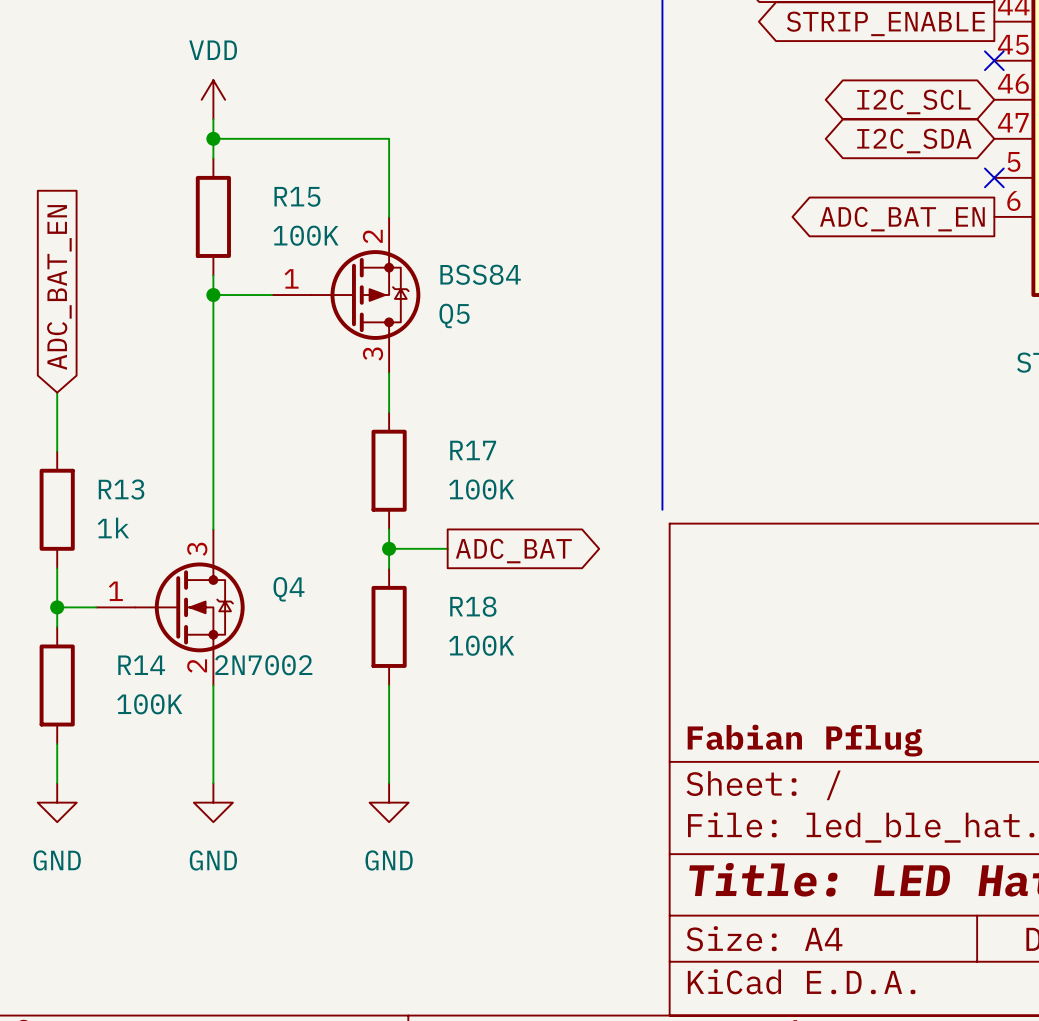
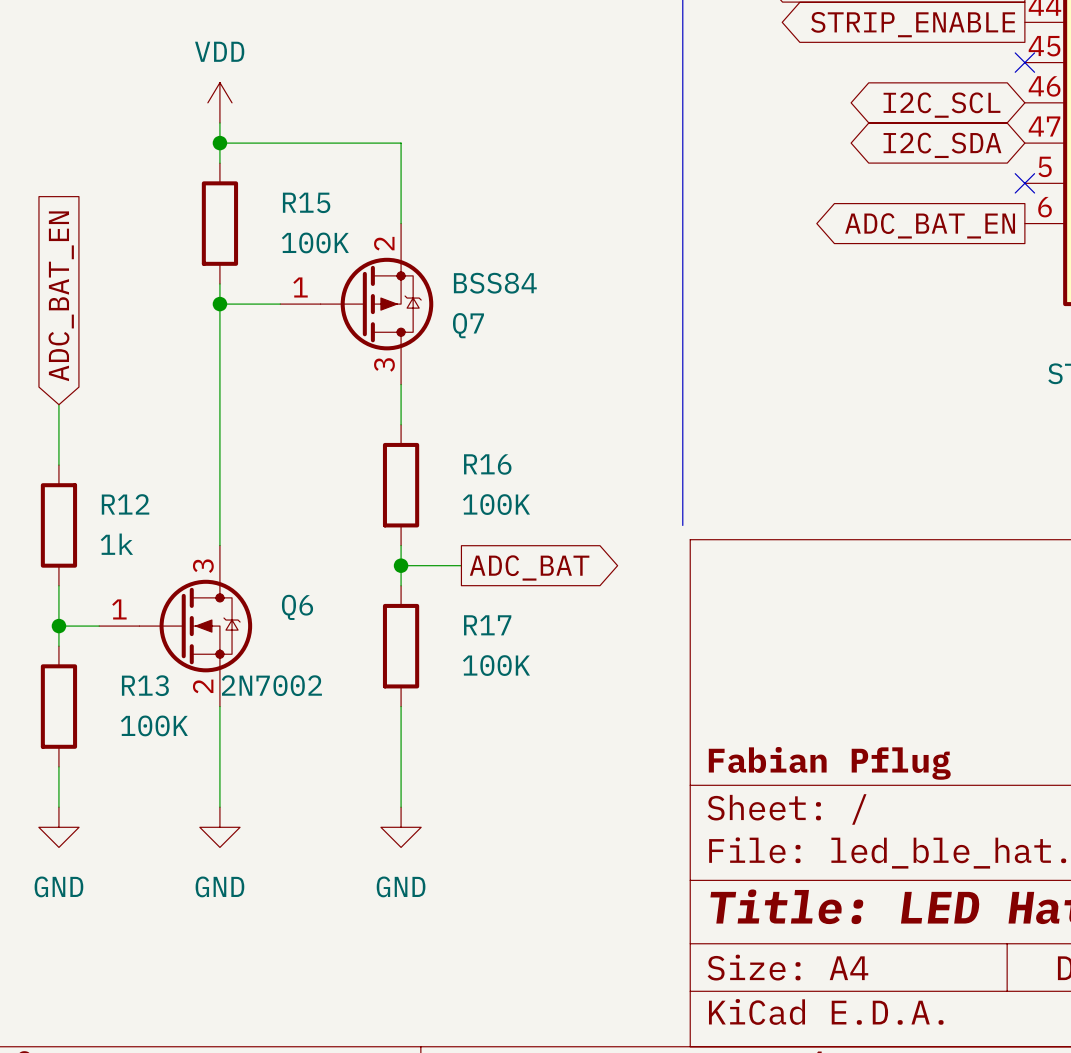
Q5 name: Q5 (454, 315) -> Q7 (468, 325)
R17 name: R17 (473, 450) -> R16 (487, 464)
R13 name: R13 (121, 489) -> R12 (125, 504)
Q4 name: Q4 (288, 589) -> Q6 (297, 607)
R18 name: R18 (473, 606) -> R17 (487, 625)
R14 name: R14 (141, 665) -> R13 (145, 685)

